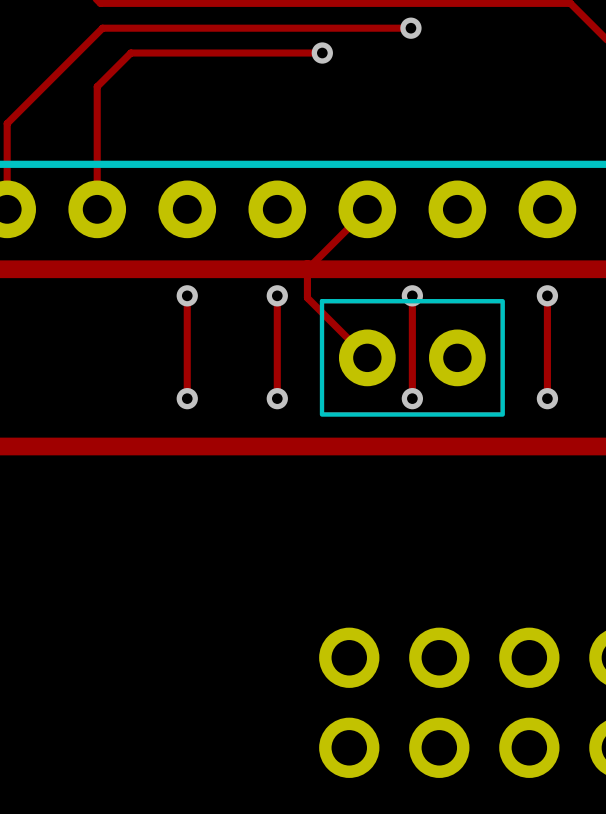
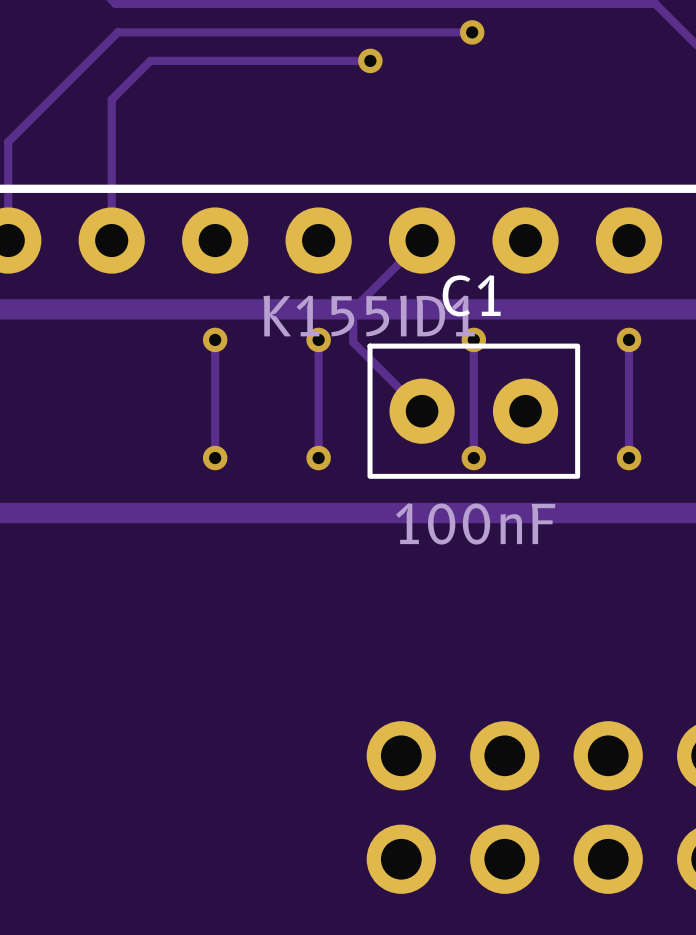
C1 name: none -> C1 (471, 295)
part value: none -> K155ID1 (369, 316)
C1 value: none -> 100nF (475, 523)

